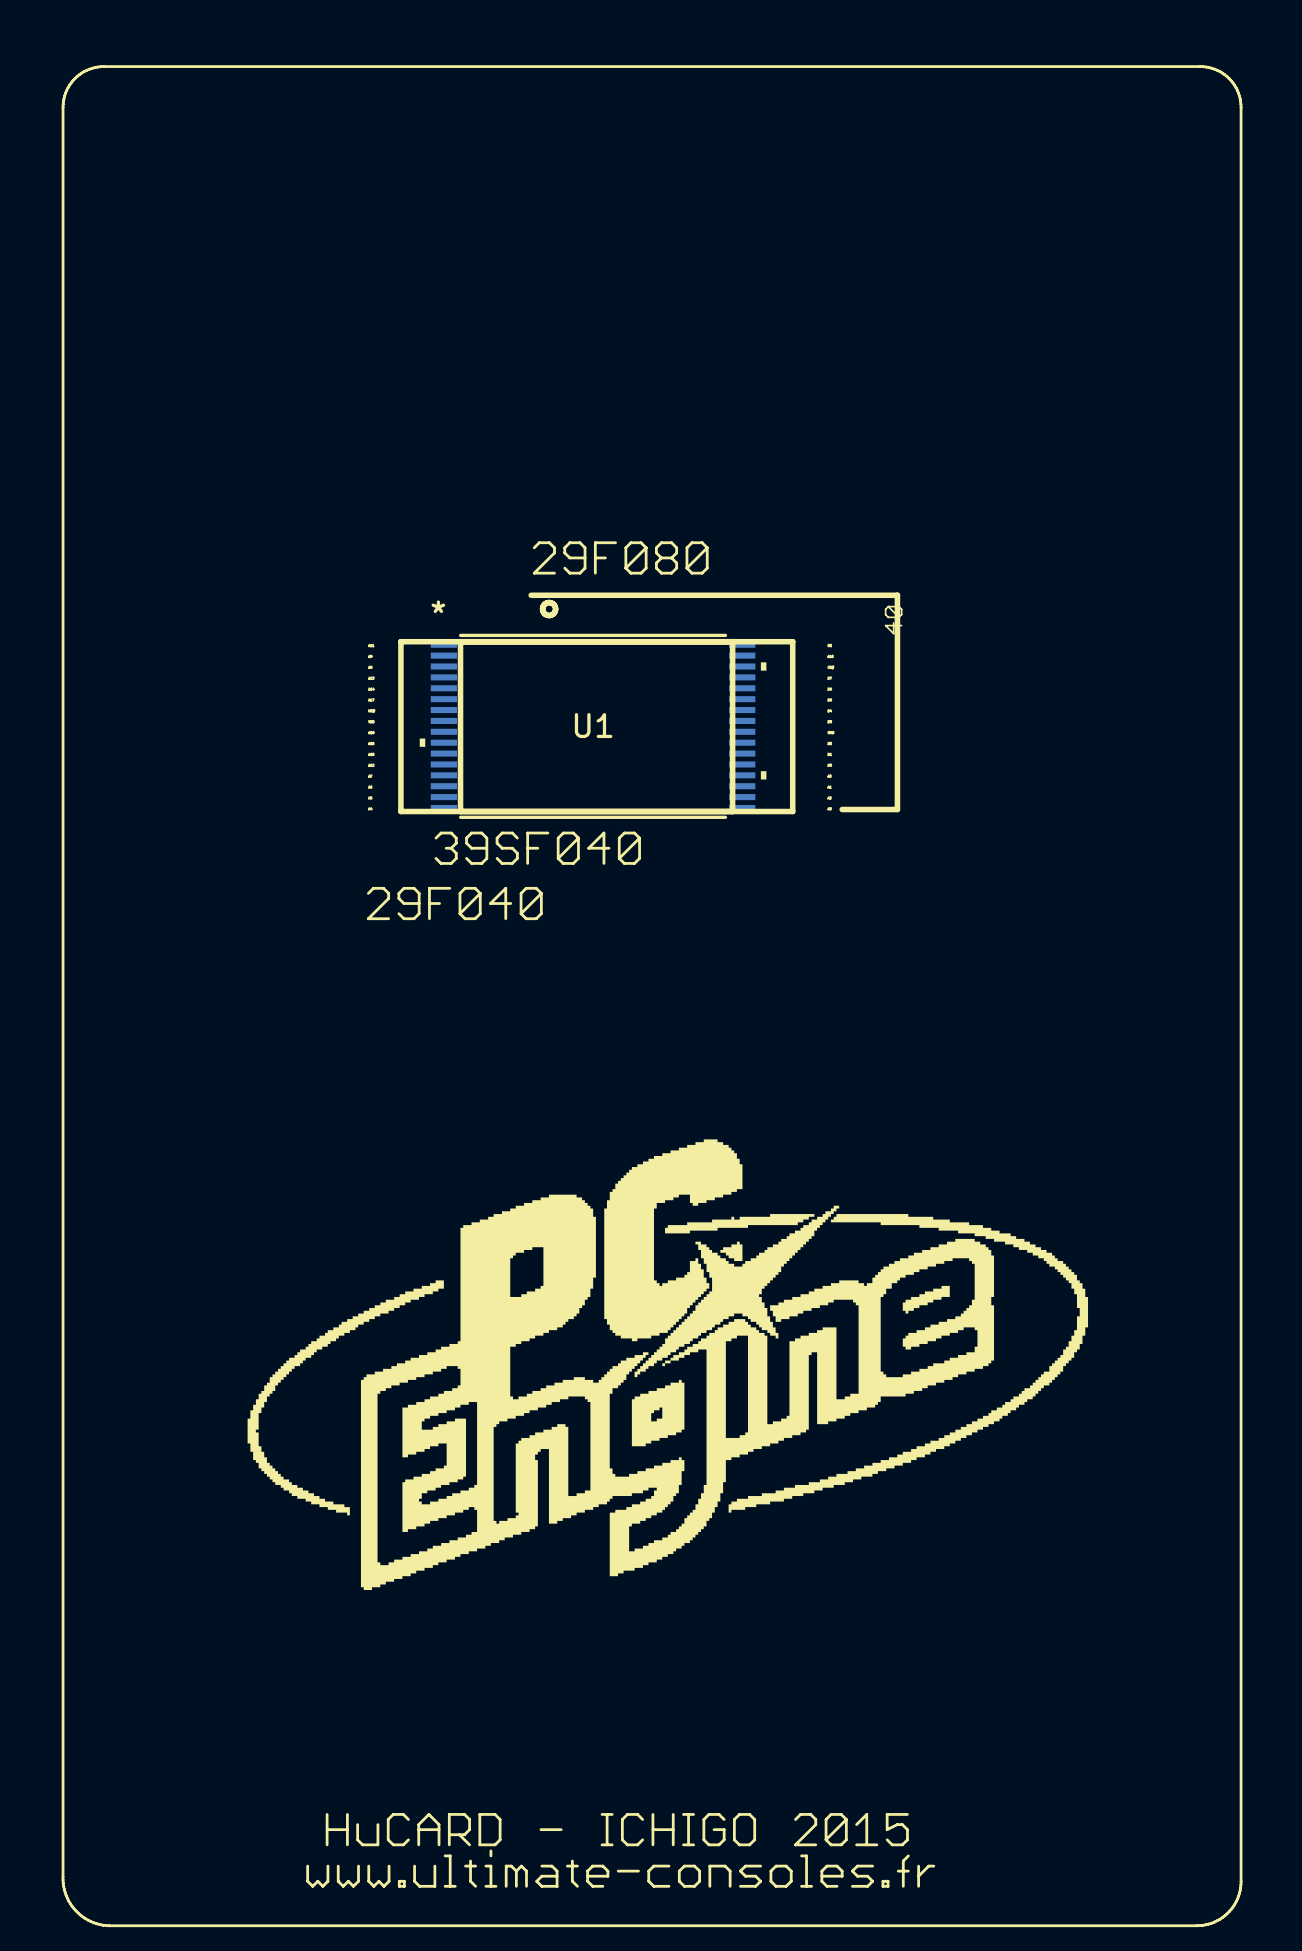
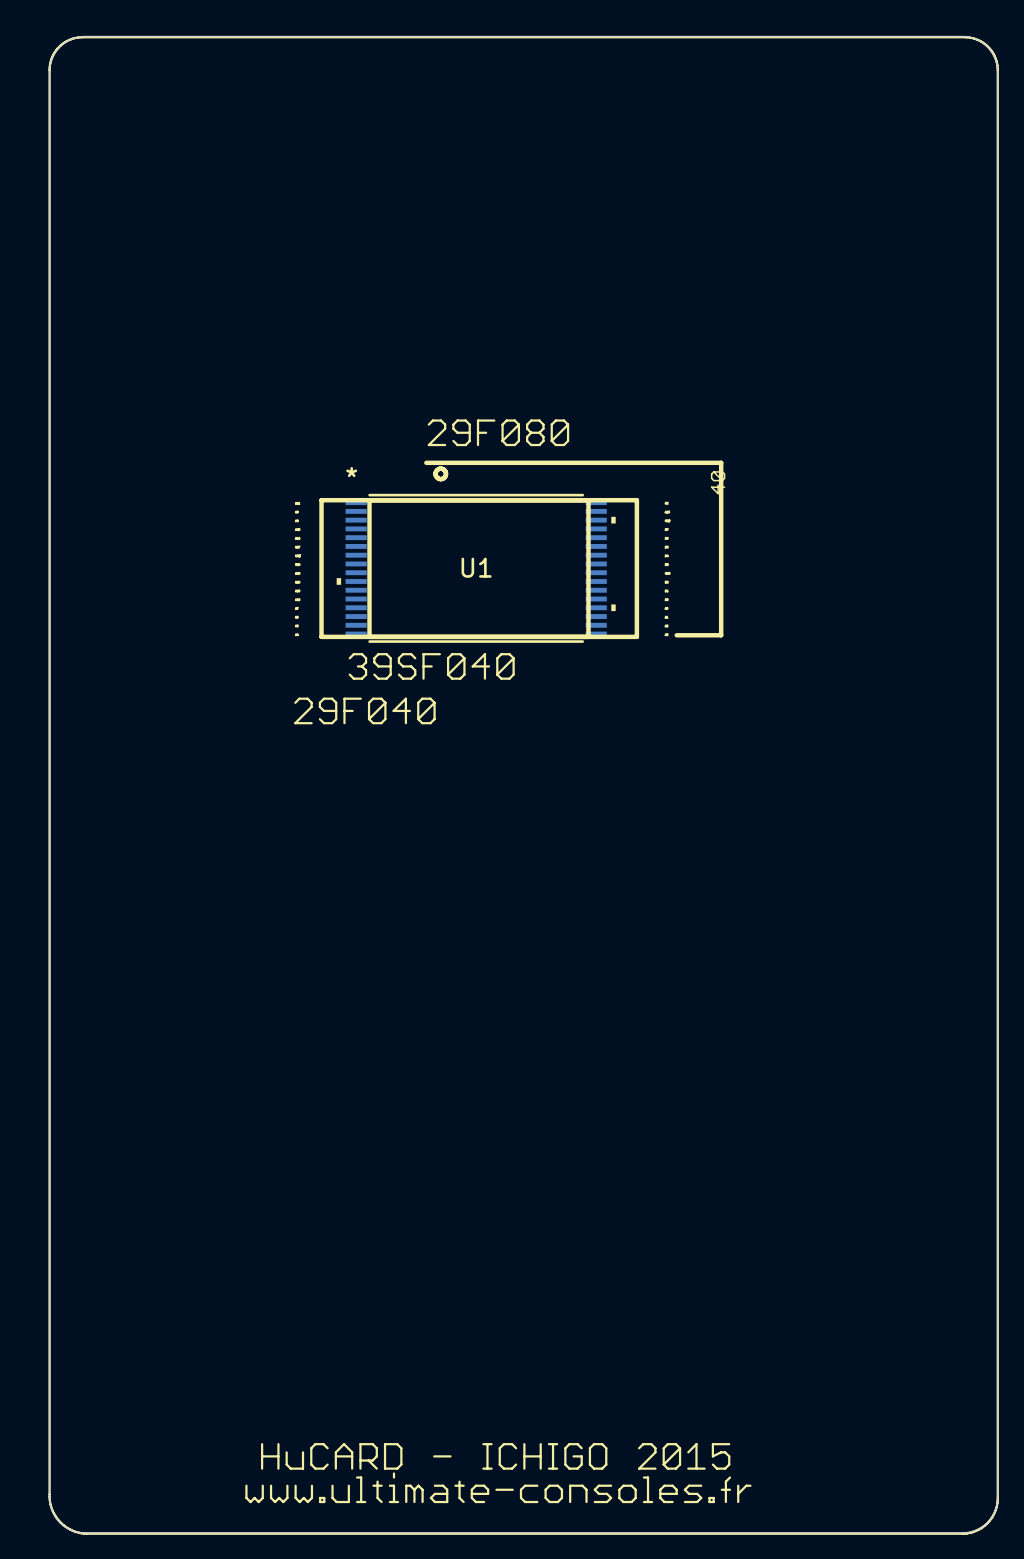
board edge: none -> (962, 36) (84, 36) (69, 40) (55, 52) (49, 71) (49, 1497) (55, 1516) (66, 1527) (84, 1532) (962, 1532) (977, 1529) (992, 1516) (997, 1497) (997, 71) (994, 56) (987, 46) (977, 40) (962, 36)
drawing: [247, 1139, 1089, 1591] -> none

